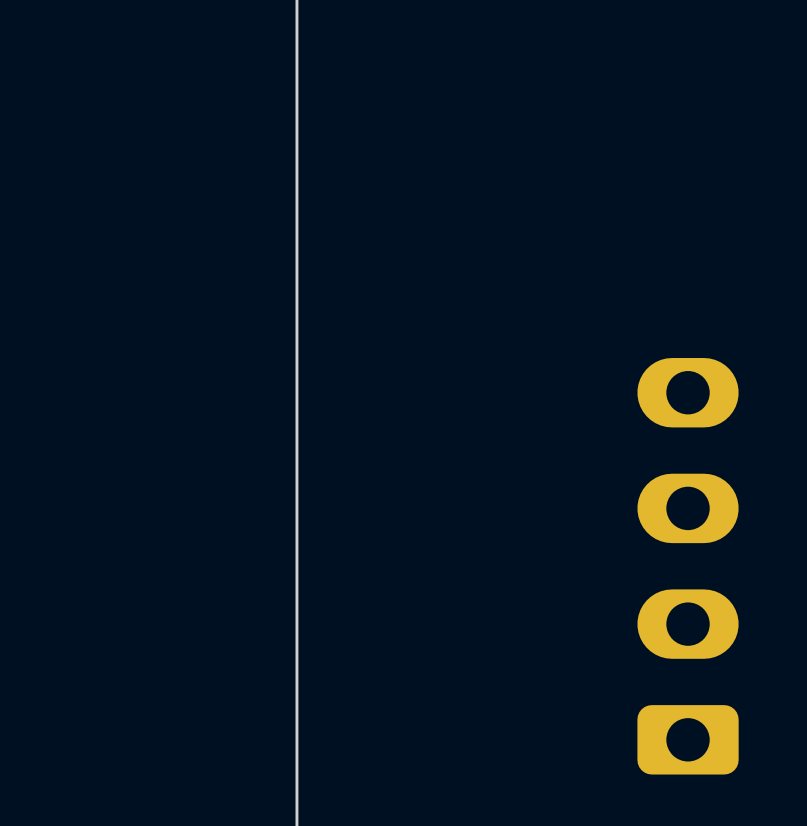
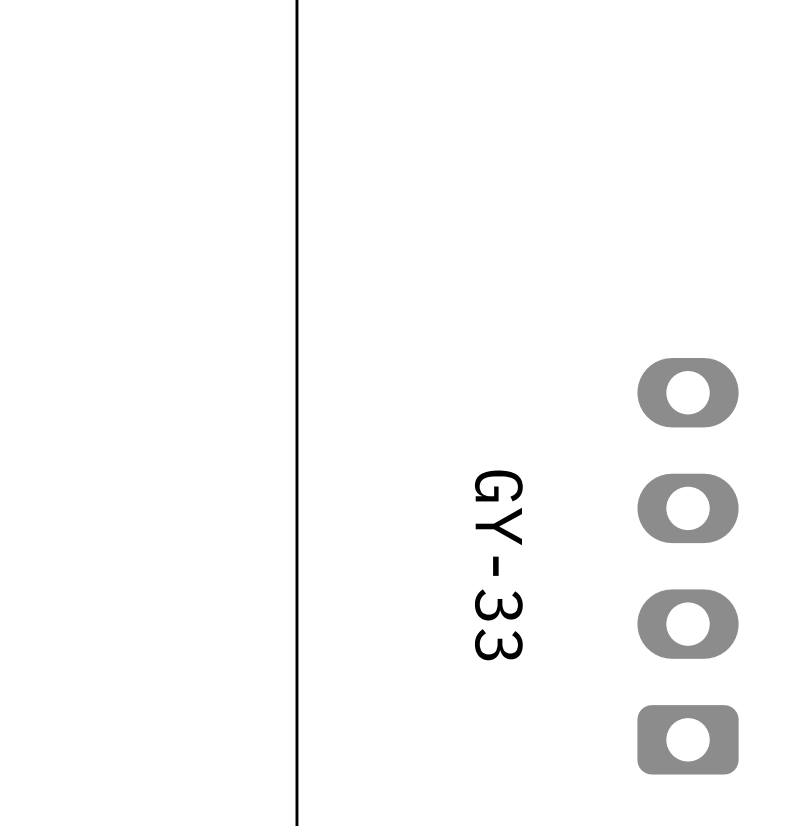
text: none -> GY-33 (498, 565)

